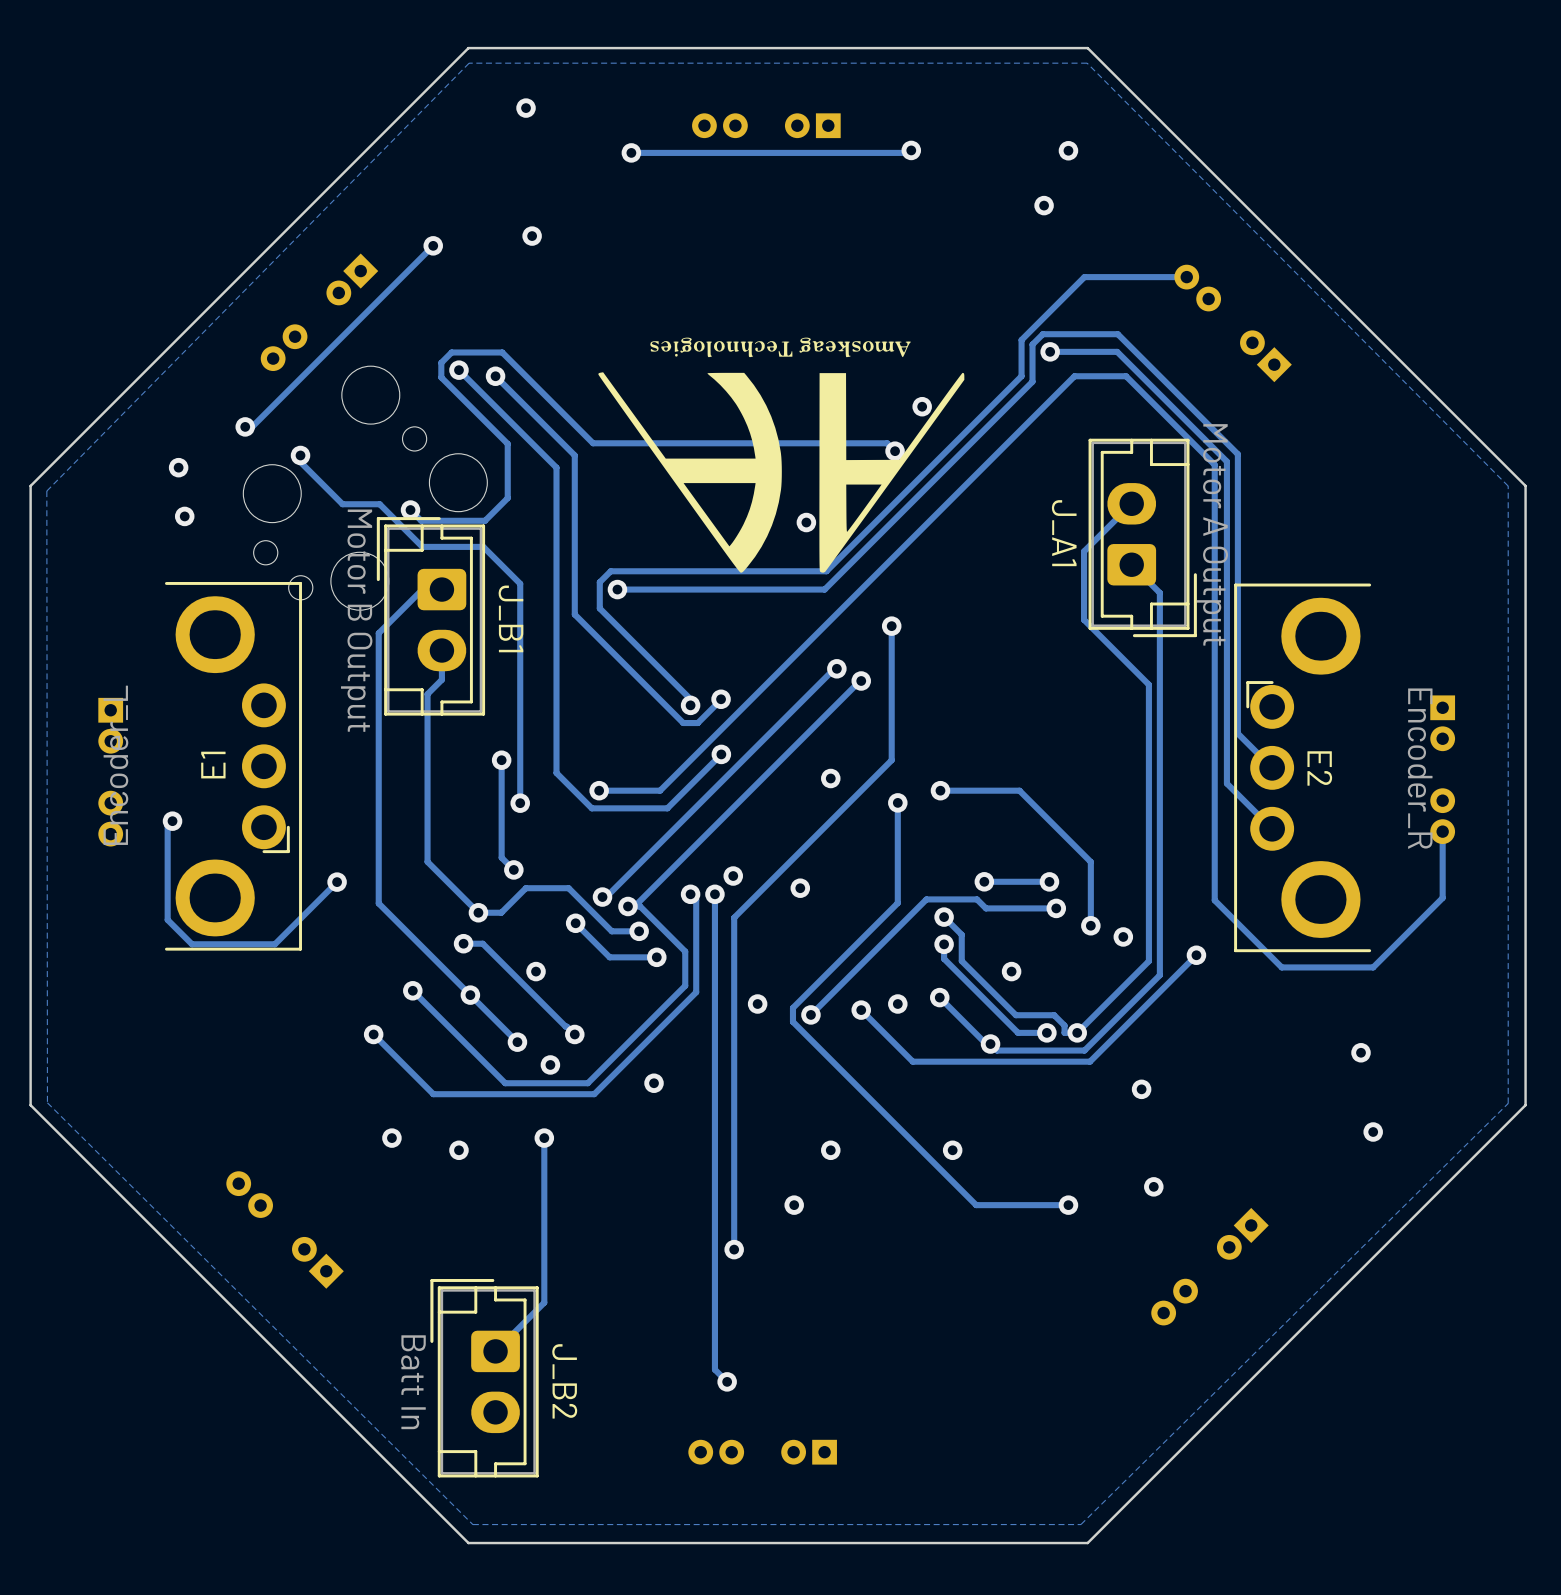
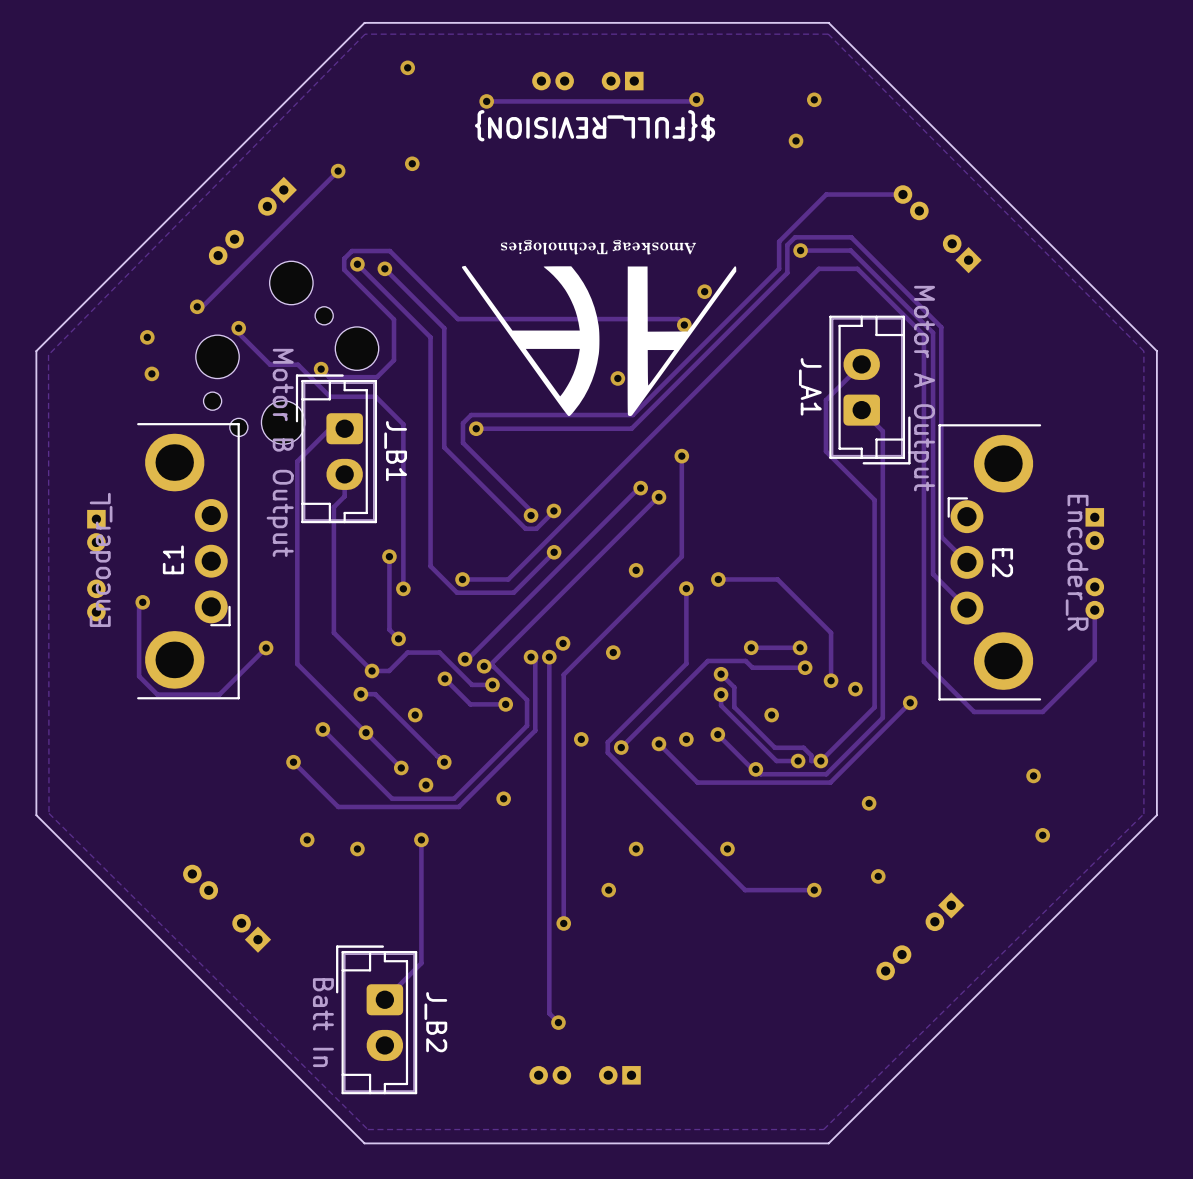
text: none -> ${FULL_REVISION} (595, 125)

